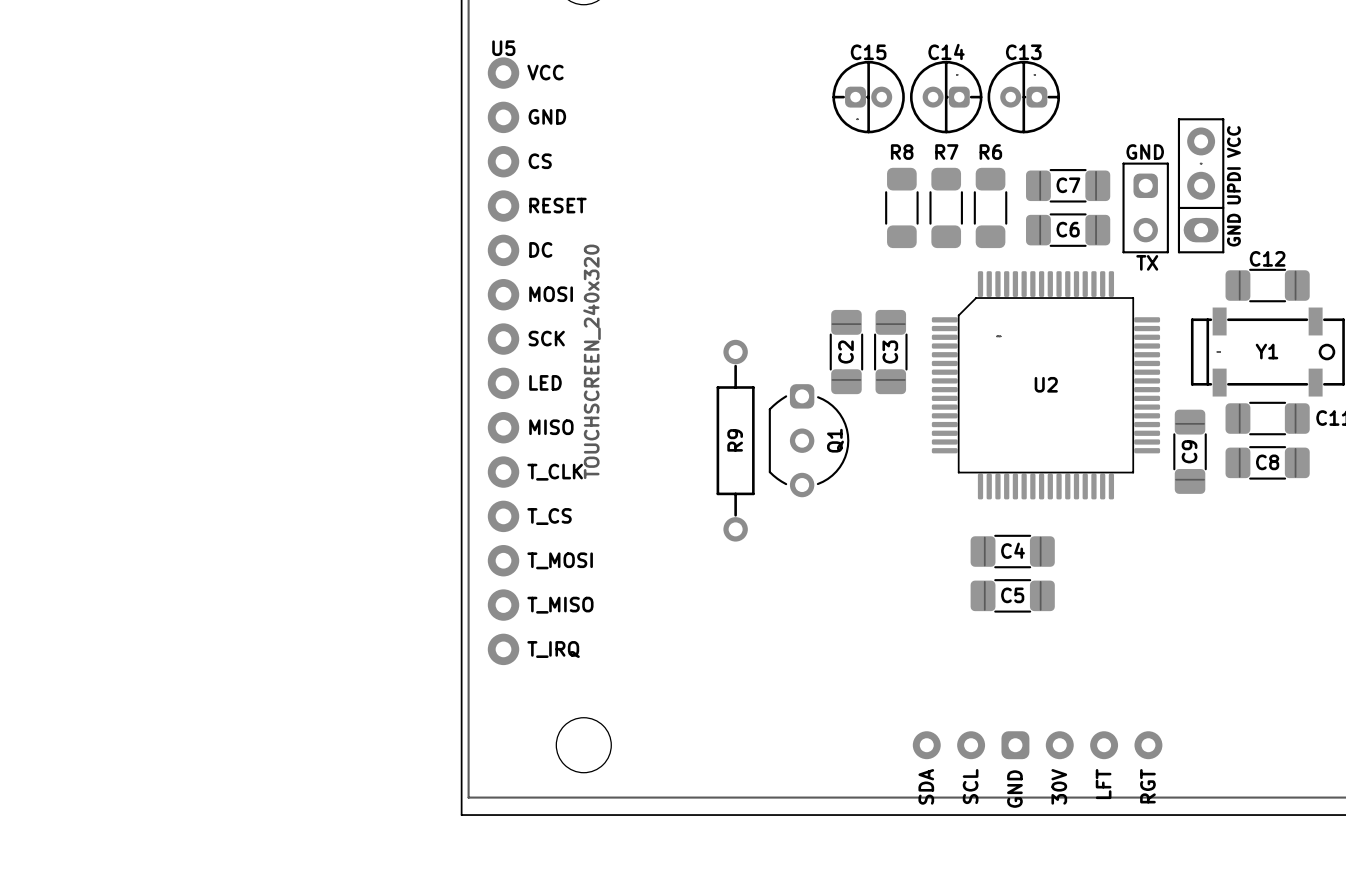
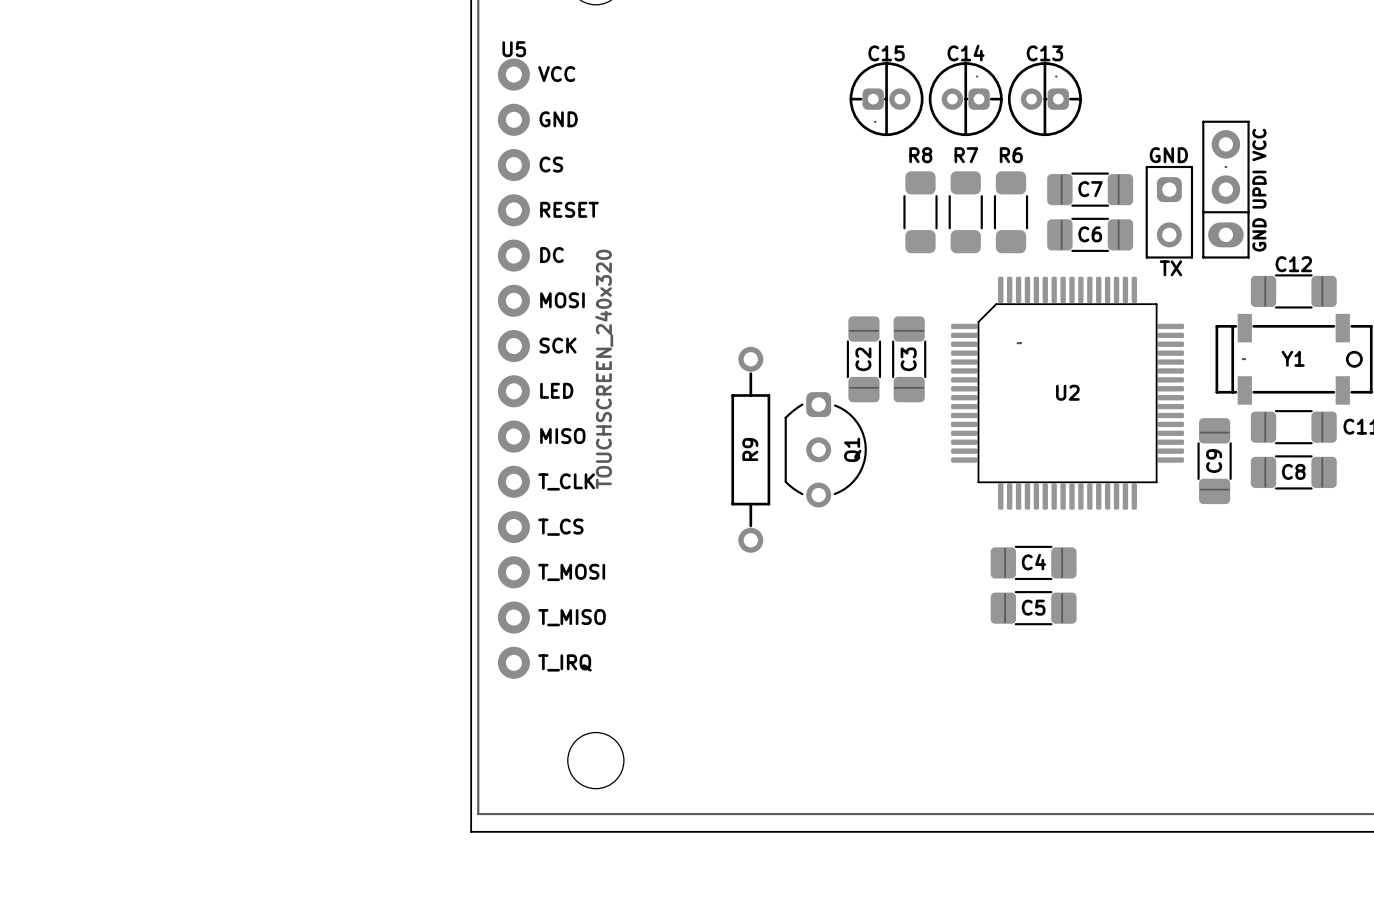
part: (1037, 745) -> none

